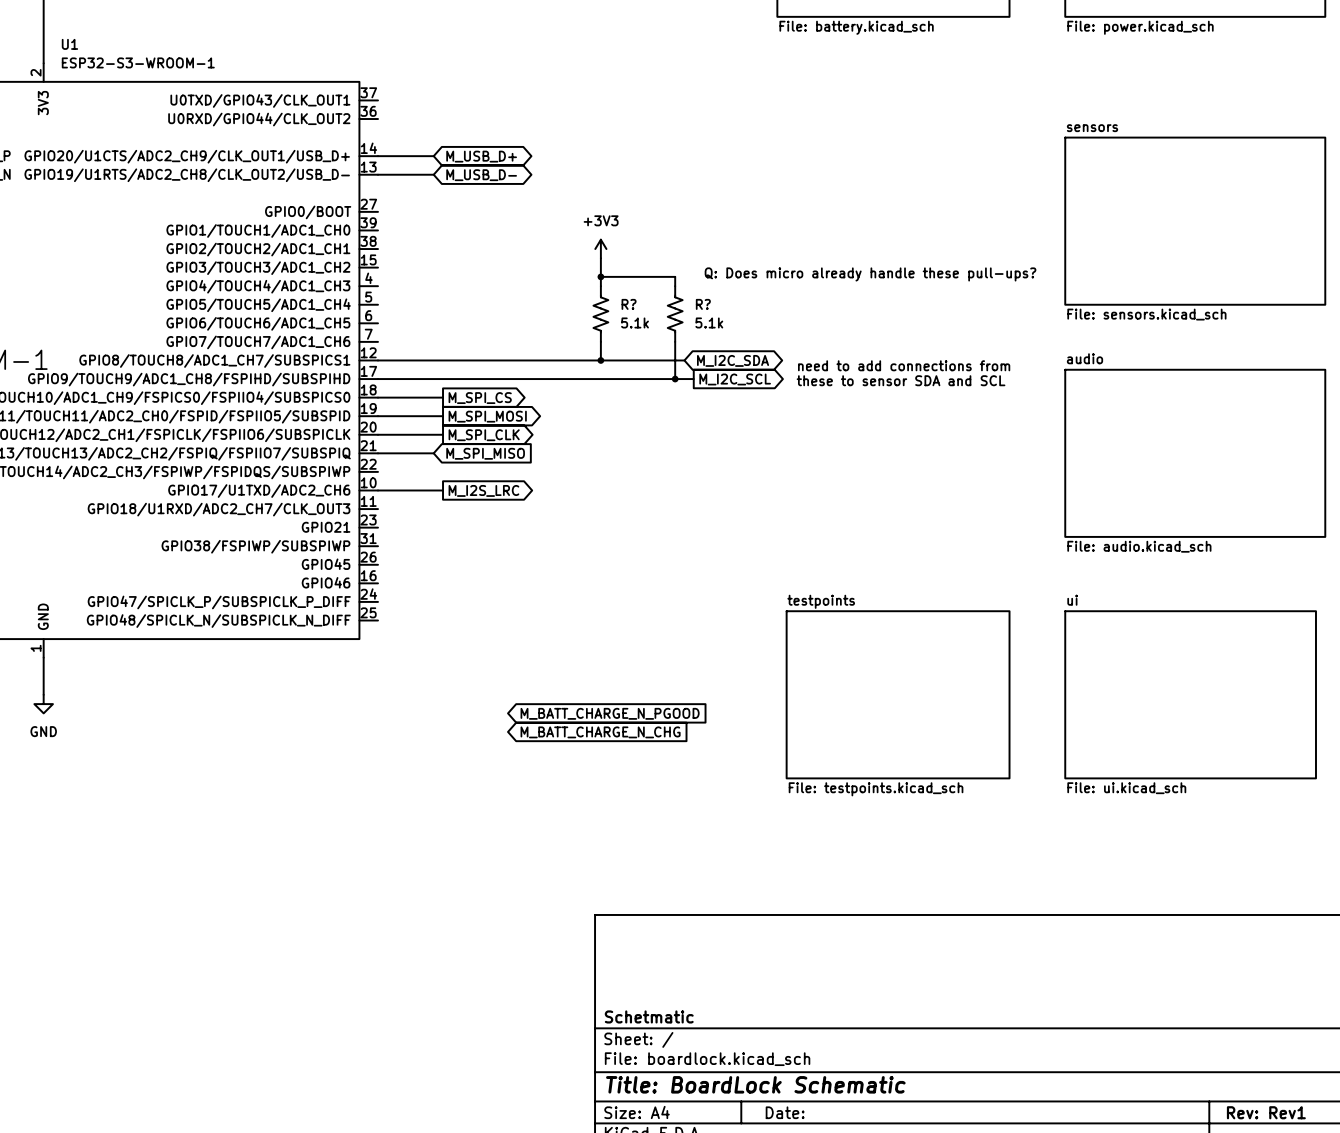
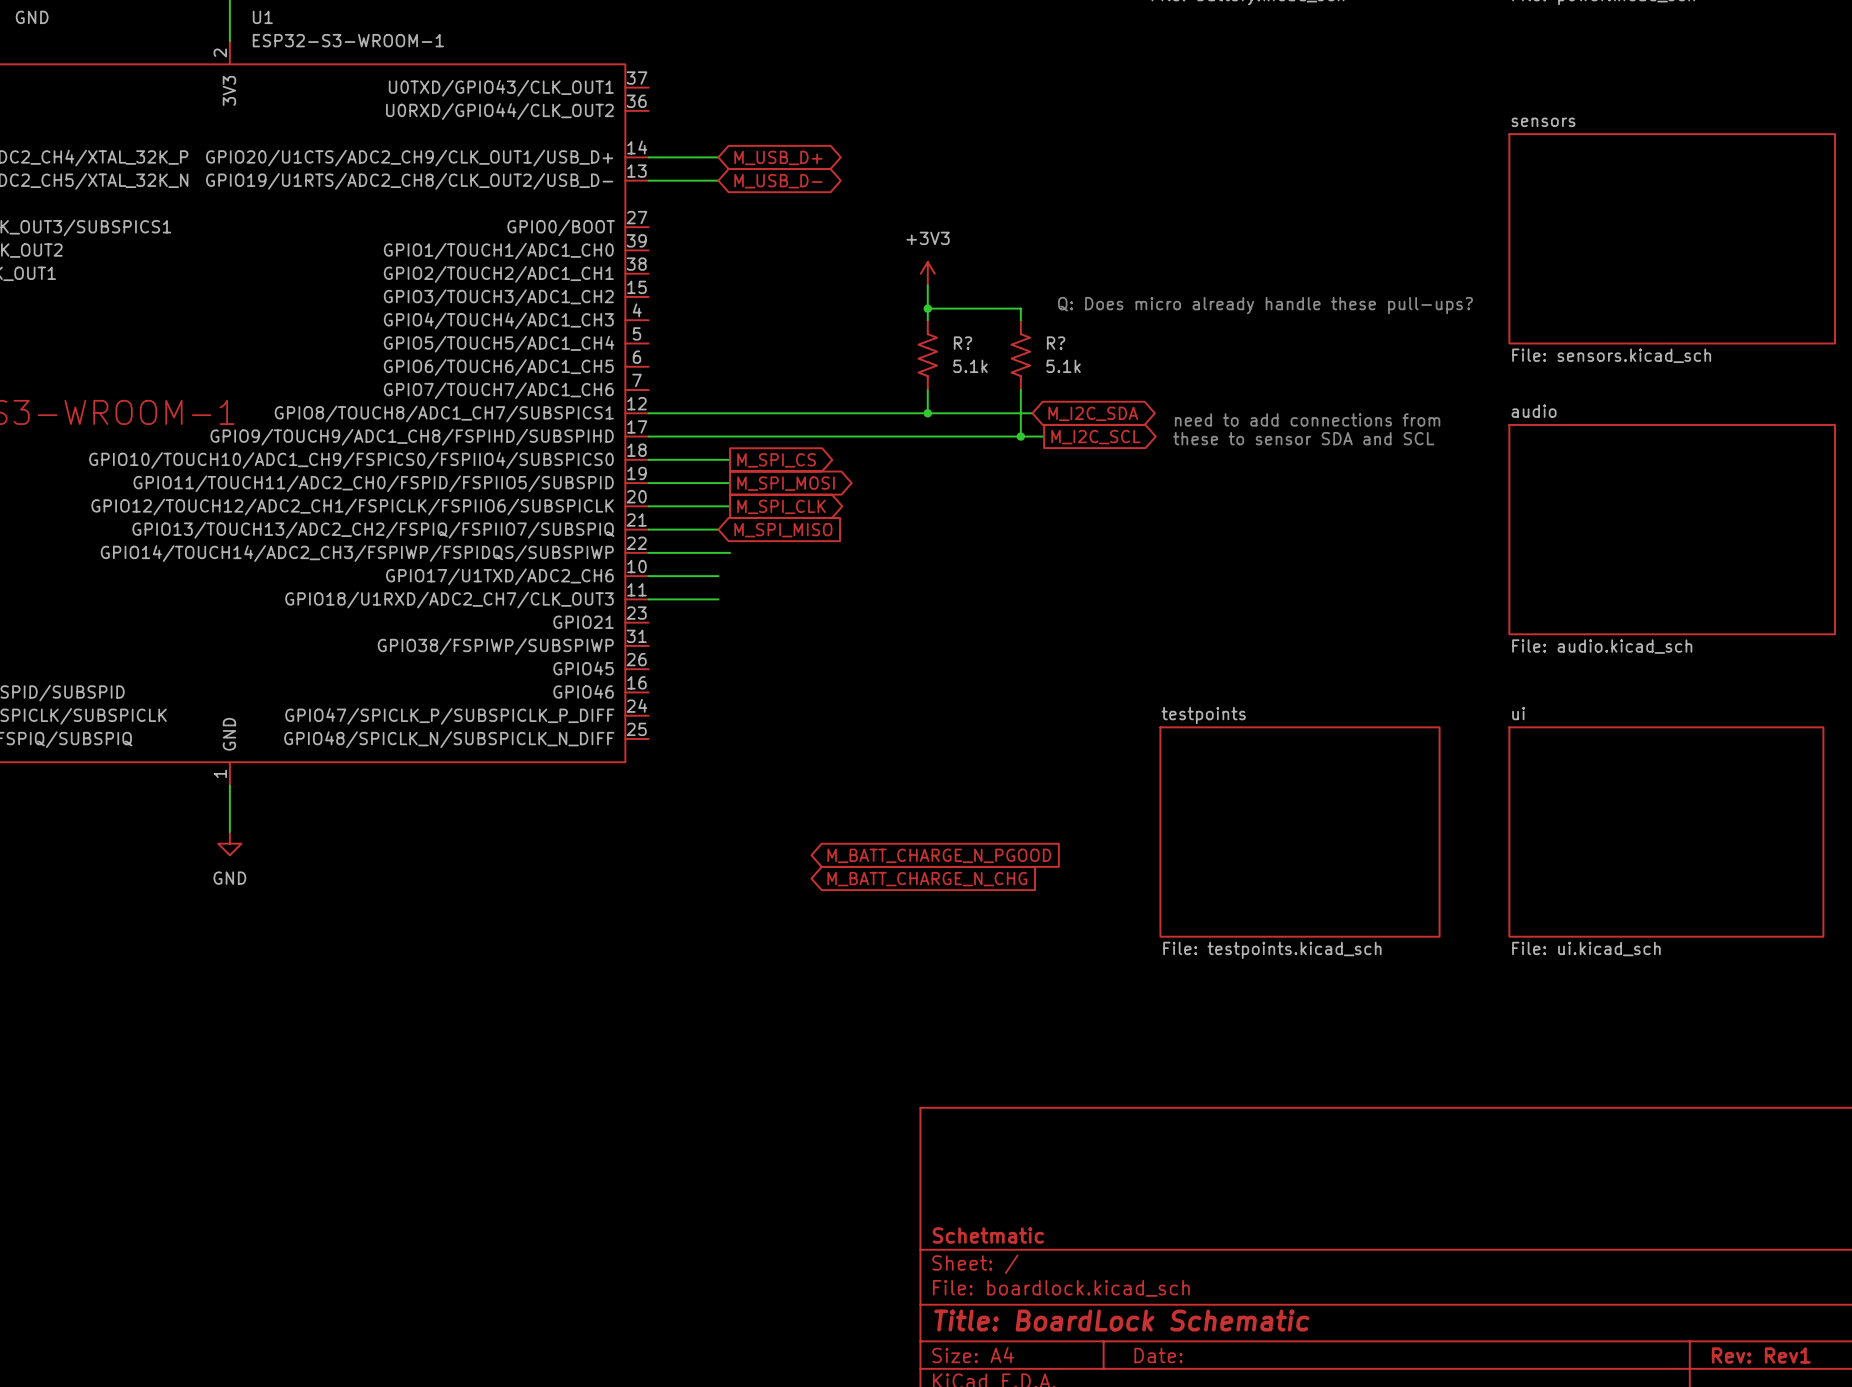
wire: none -> (648, 552) (730, 552)
wire: (433, 490) (443, 490) -> none
global label: M_I2S_LRC (483, 490) -> none
wire: none -> (648, 599) (718, 599)

